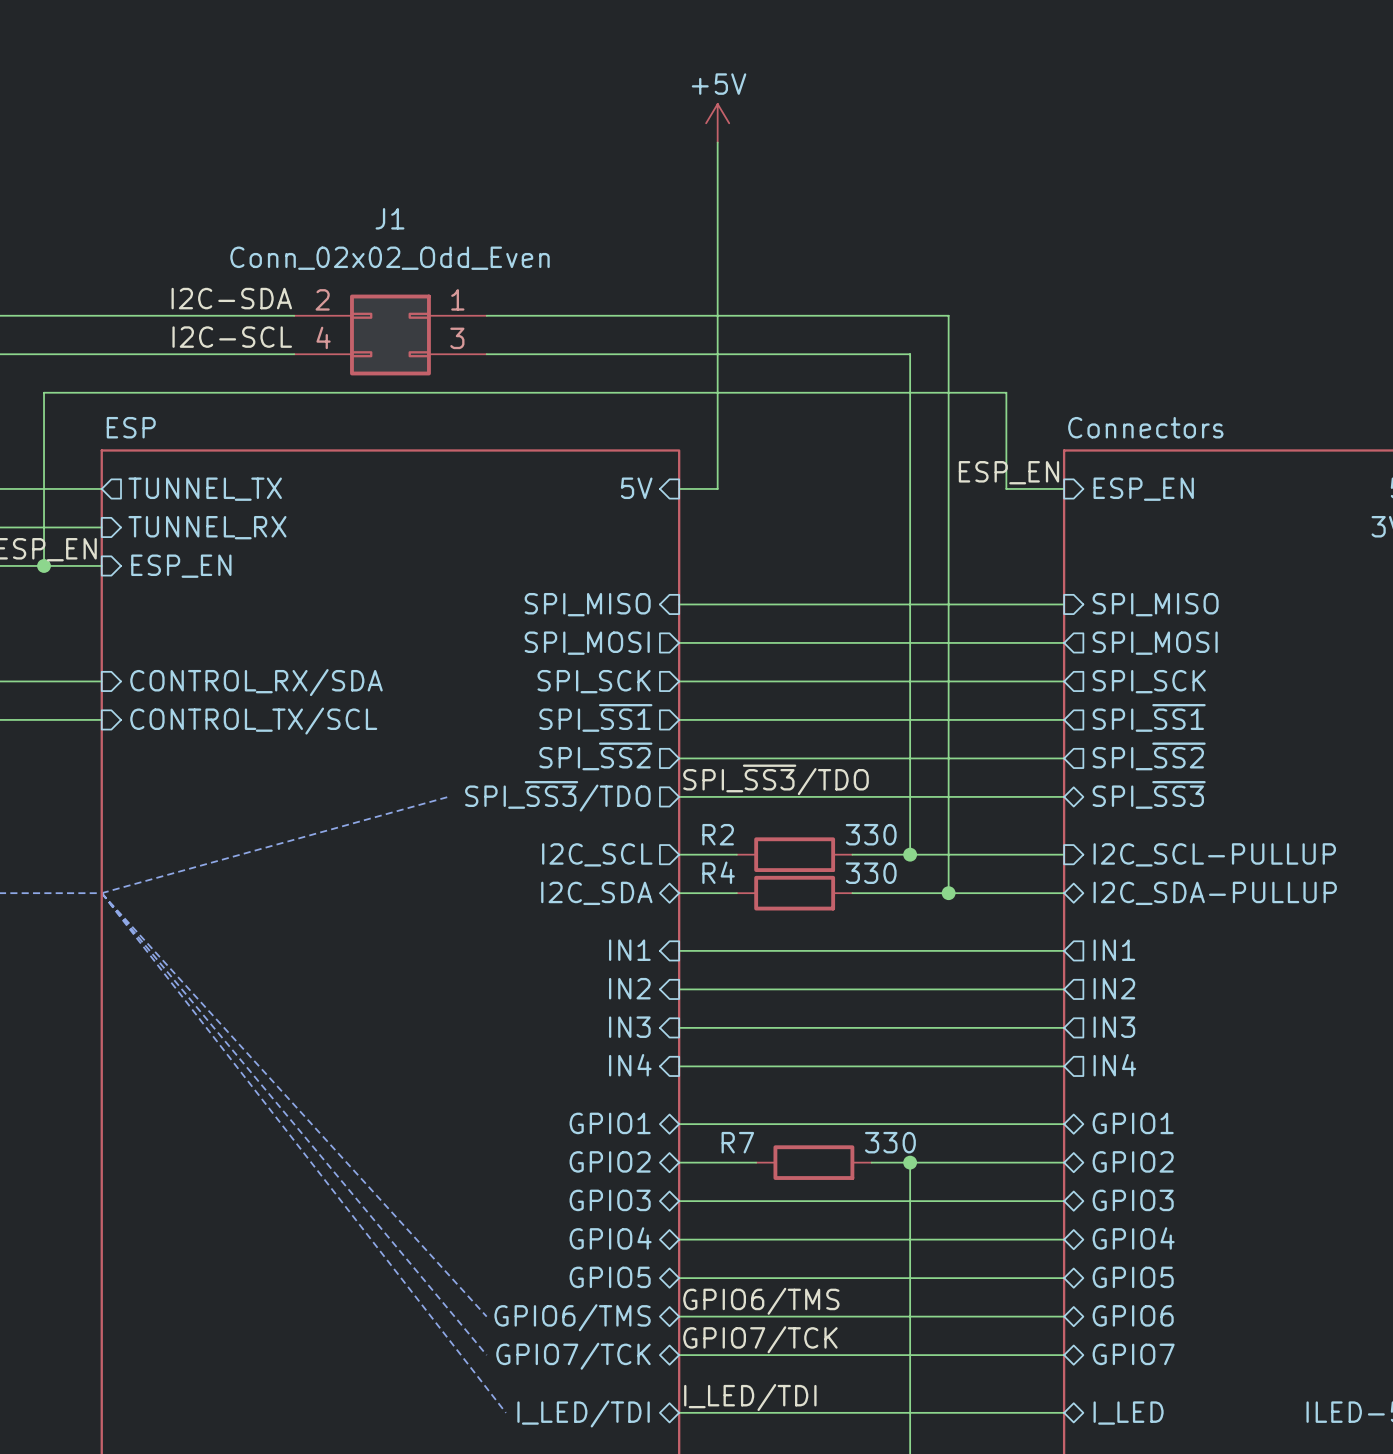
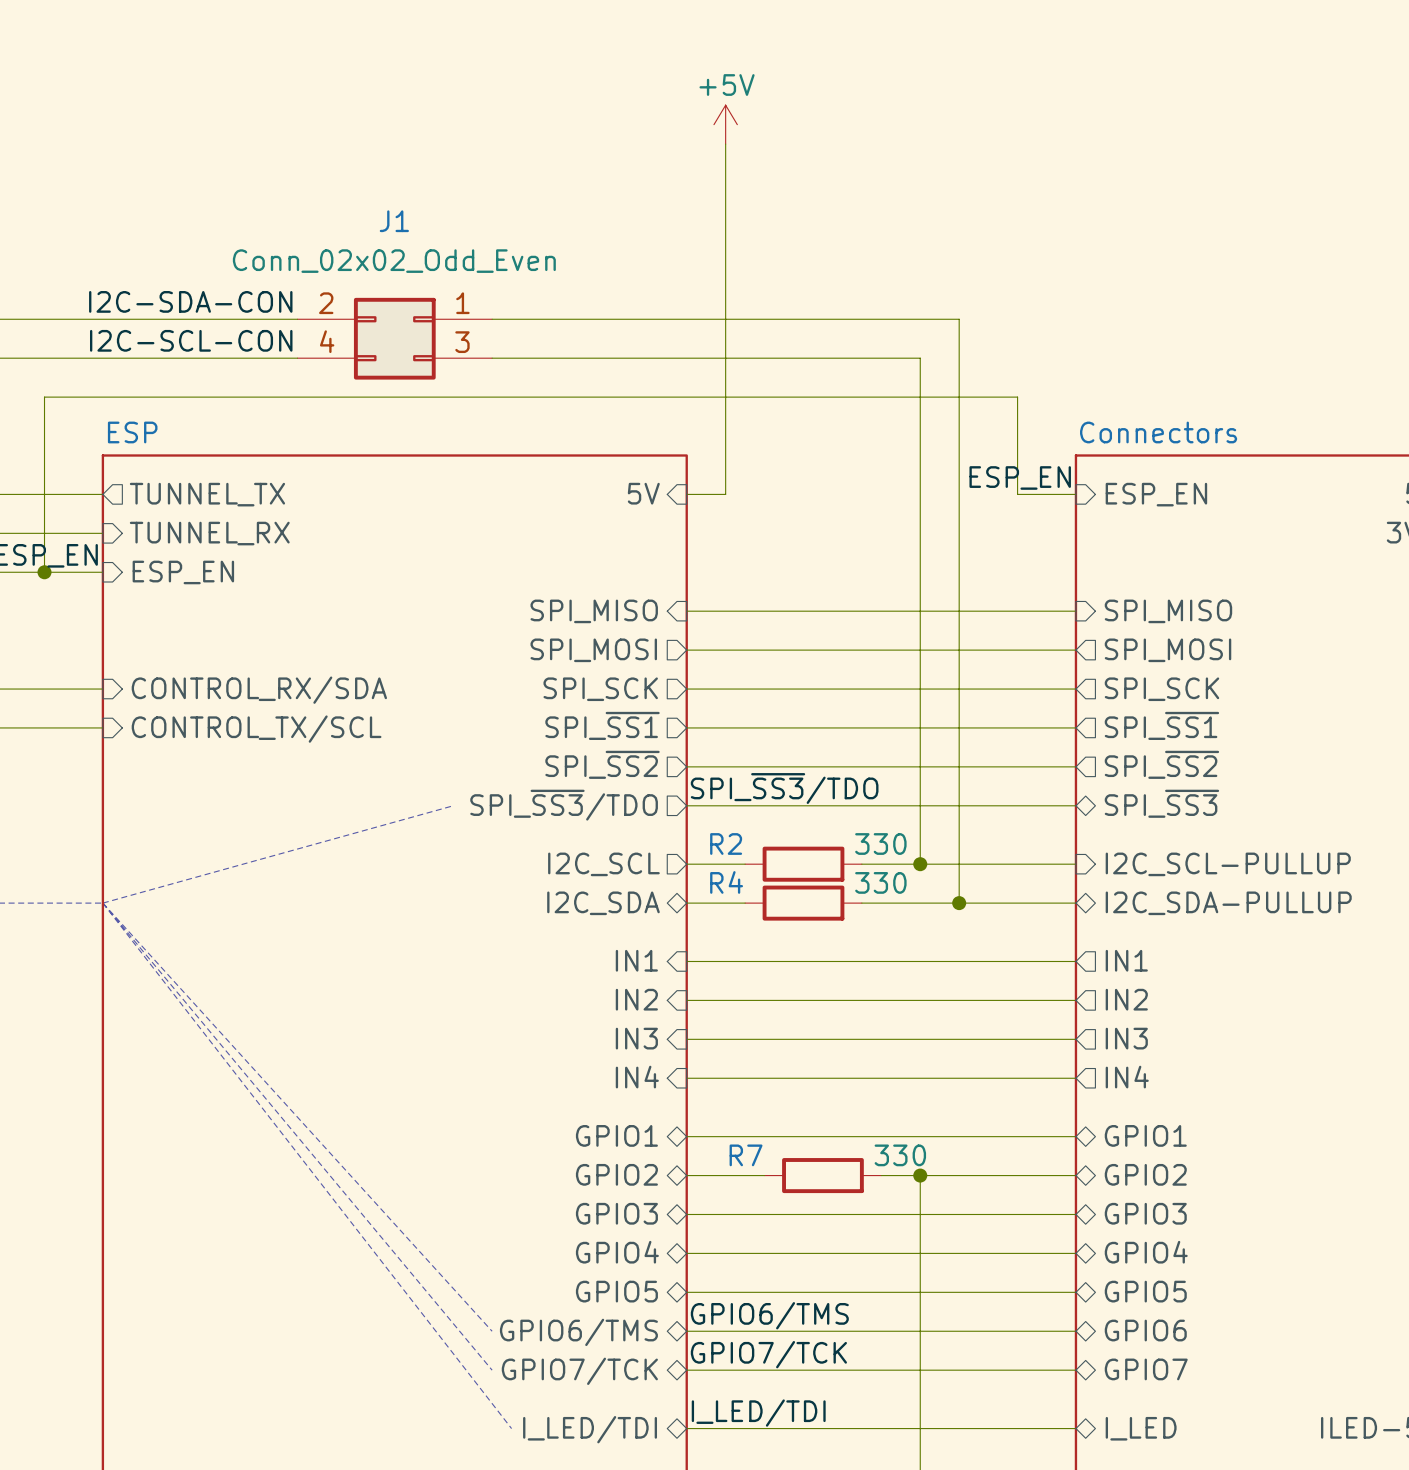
label: I2C-SDA (231, 298) -> I2C-SDA-CON (190, 301)
label: I2C-SCL (232, 337) -> I2C-SCL-CON (191, 340)

